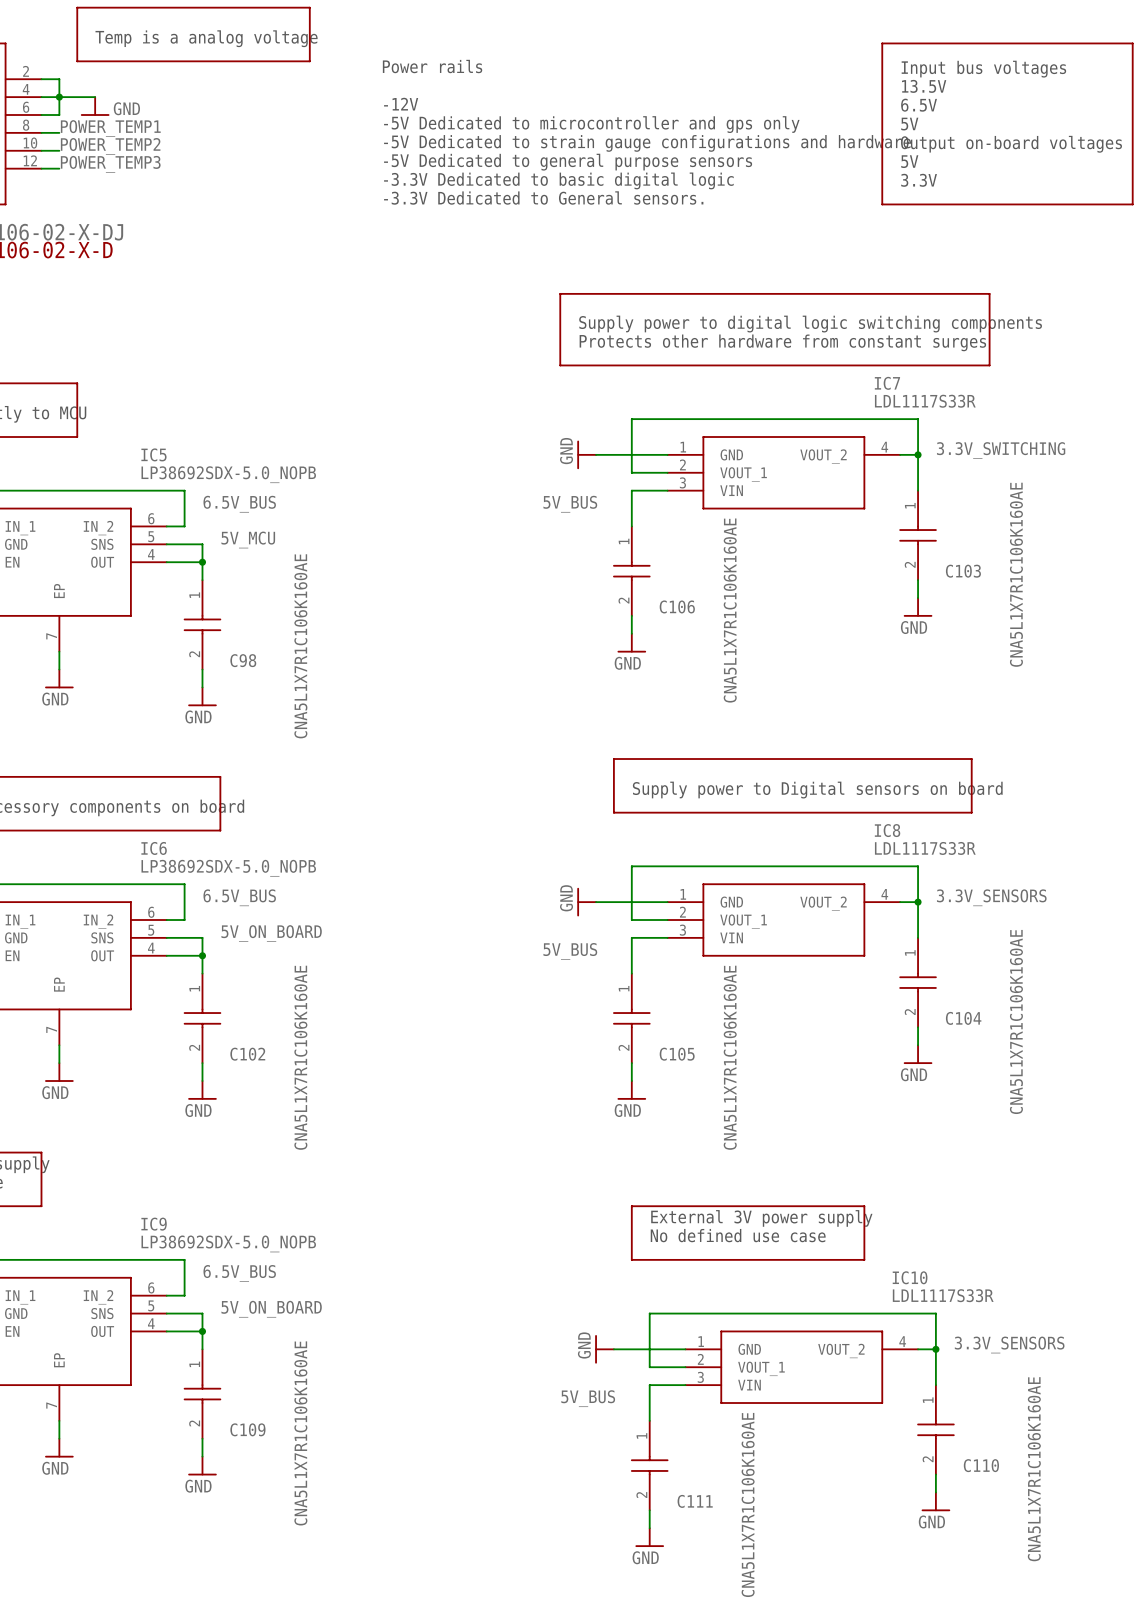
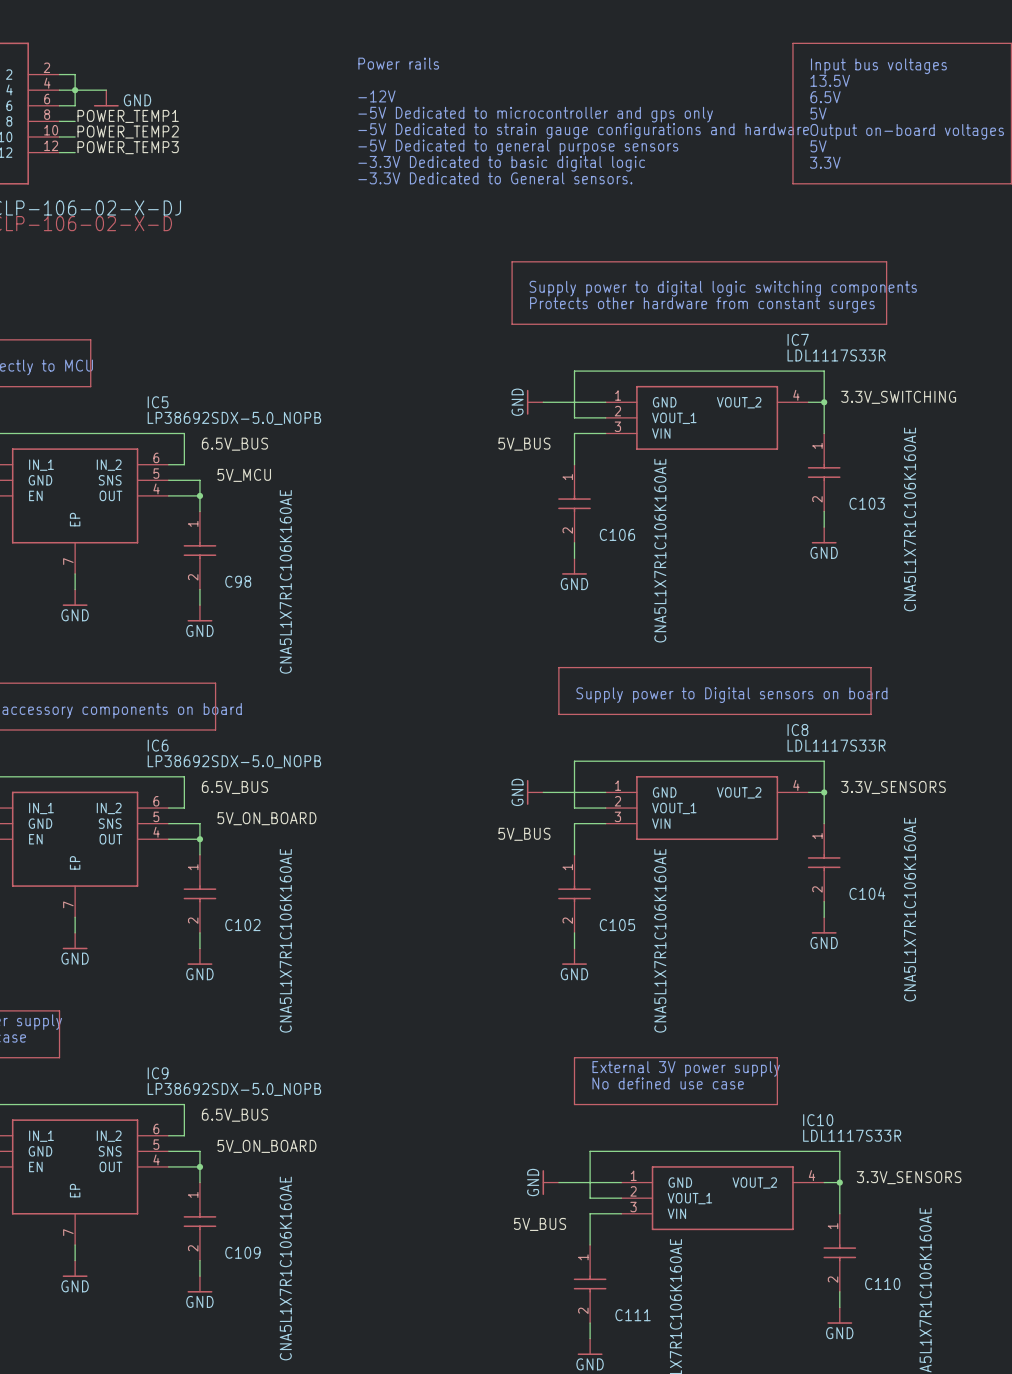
line: (77, 7) (77, 61) (309, 61) (309, 7) (77, 7) -> none
text: Temp is a analog voltage (206, 38) -> none

